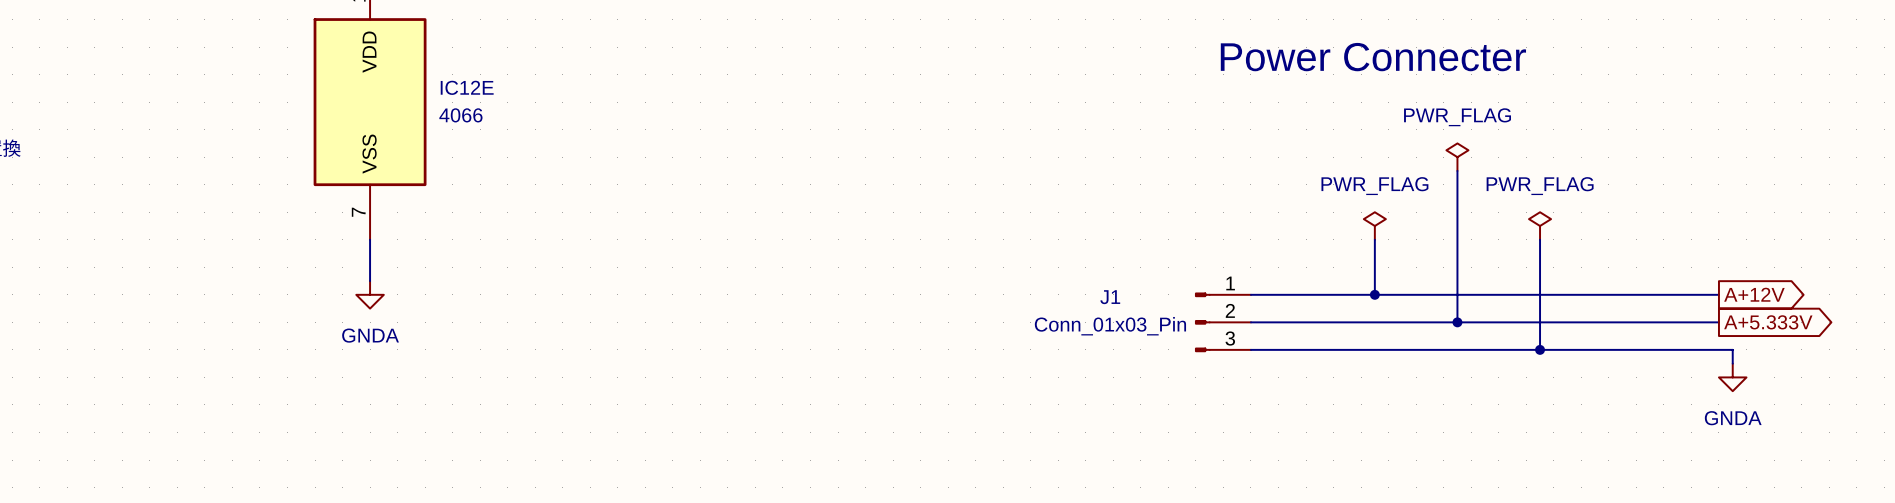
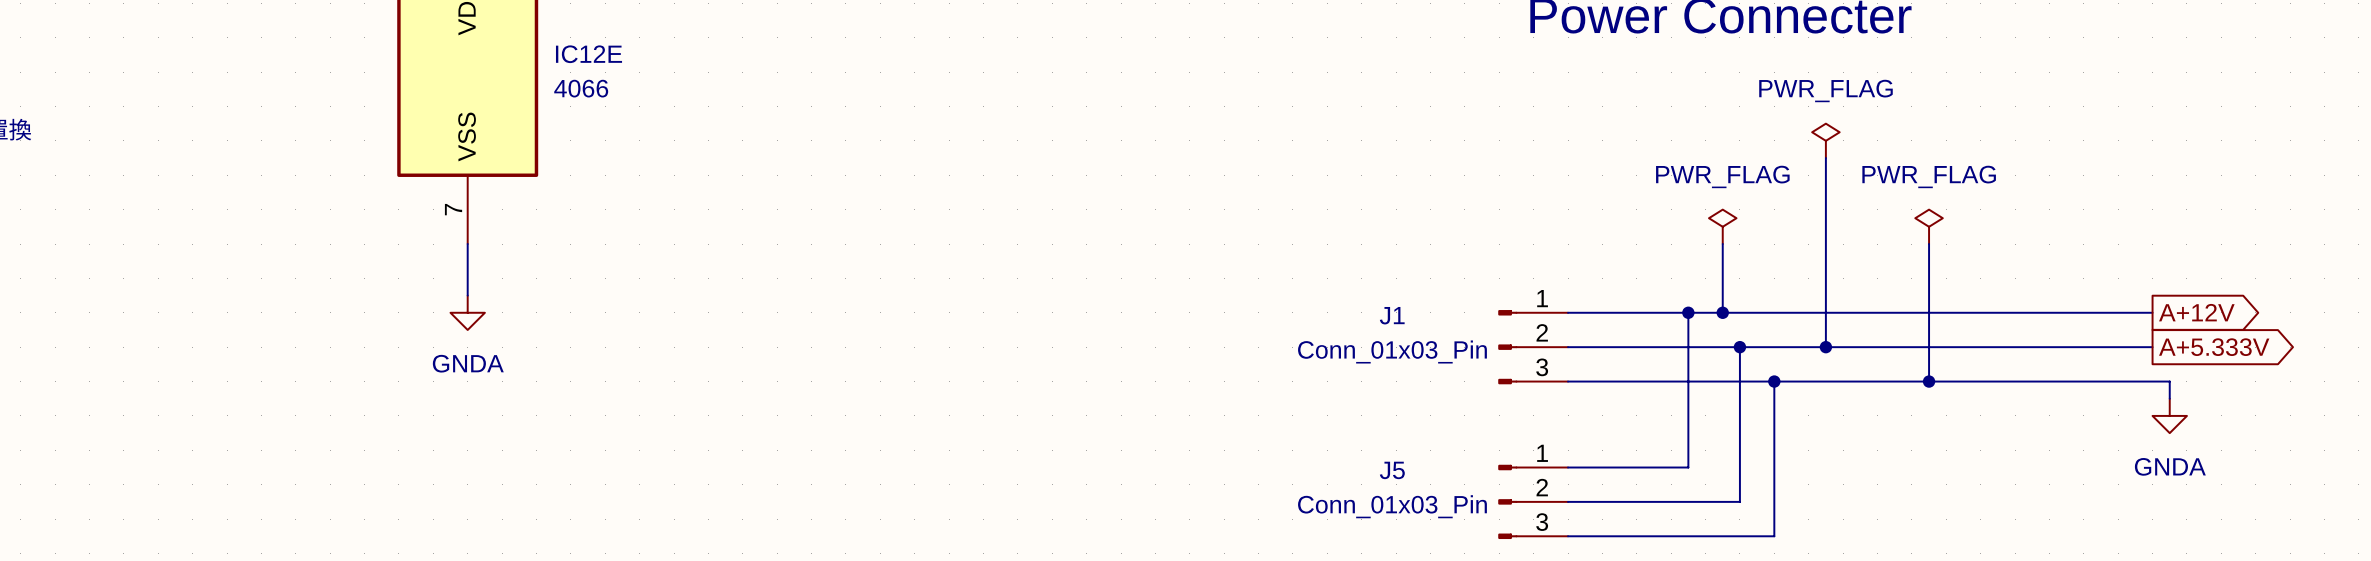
wire: none -> (1688, 312) (1688, 467) (1568, 467)
junction: none -> (1688, 312)
wire: none -> (1739, 347) (1739, 501) (1568, 501)
junction: none -> (1739, 347)
wire: none -> (1774, 381) (1774, 536) (1568, 536)
junction: none -> (1774, 381)
J5: none -> Conn_01x03_Pin (1533, 501)

